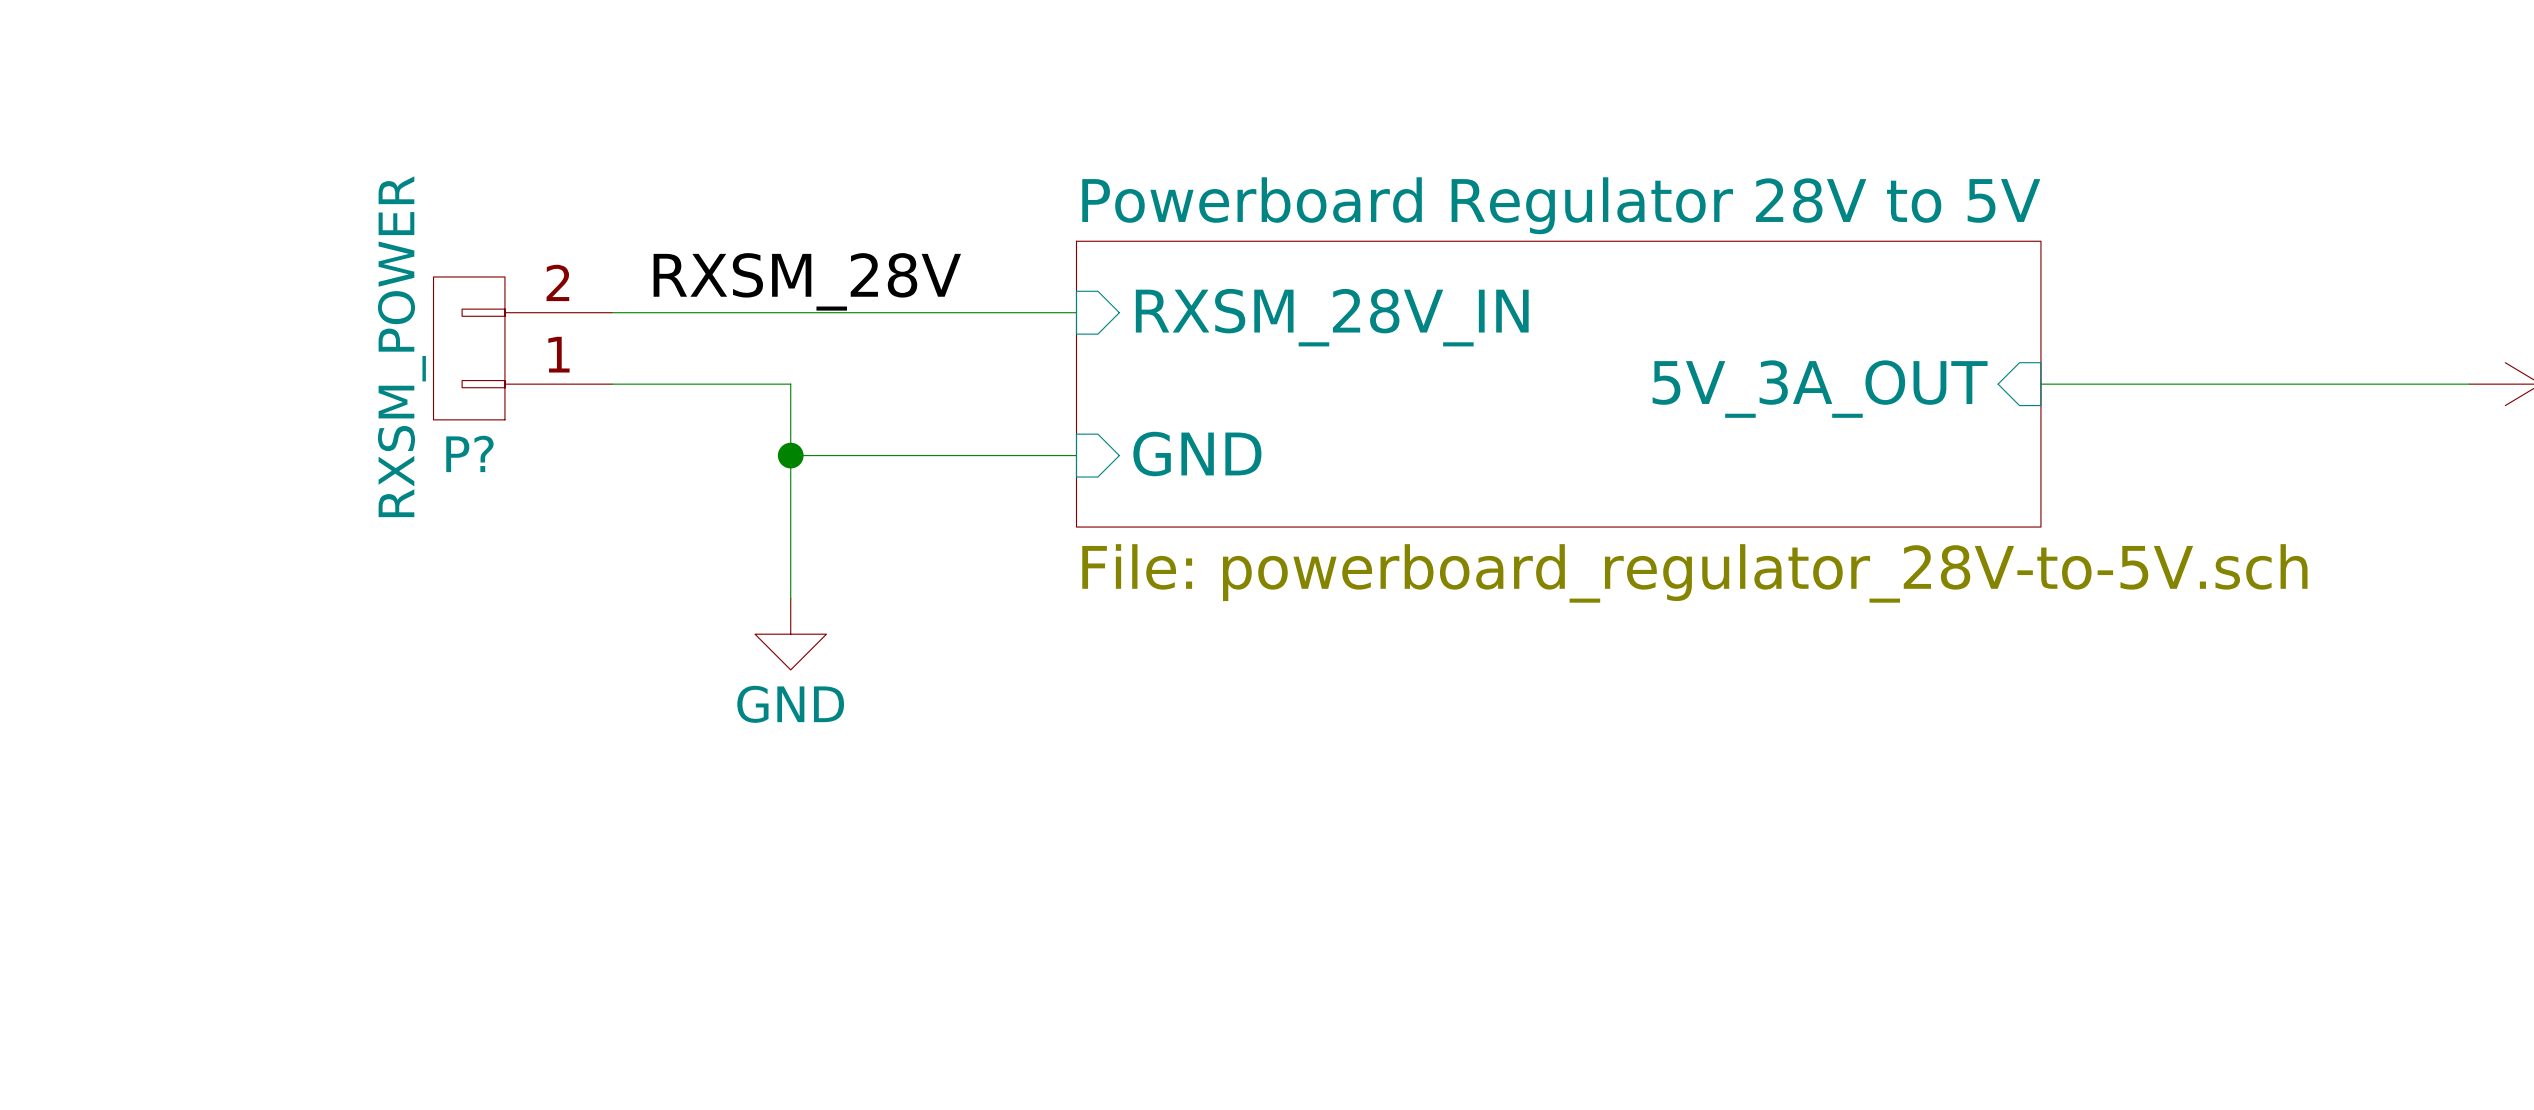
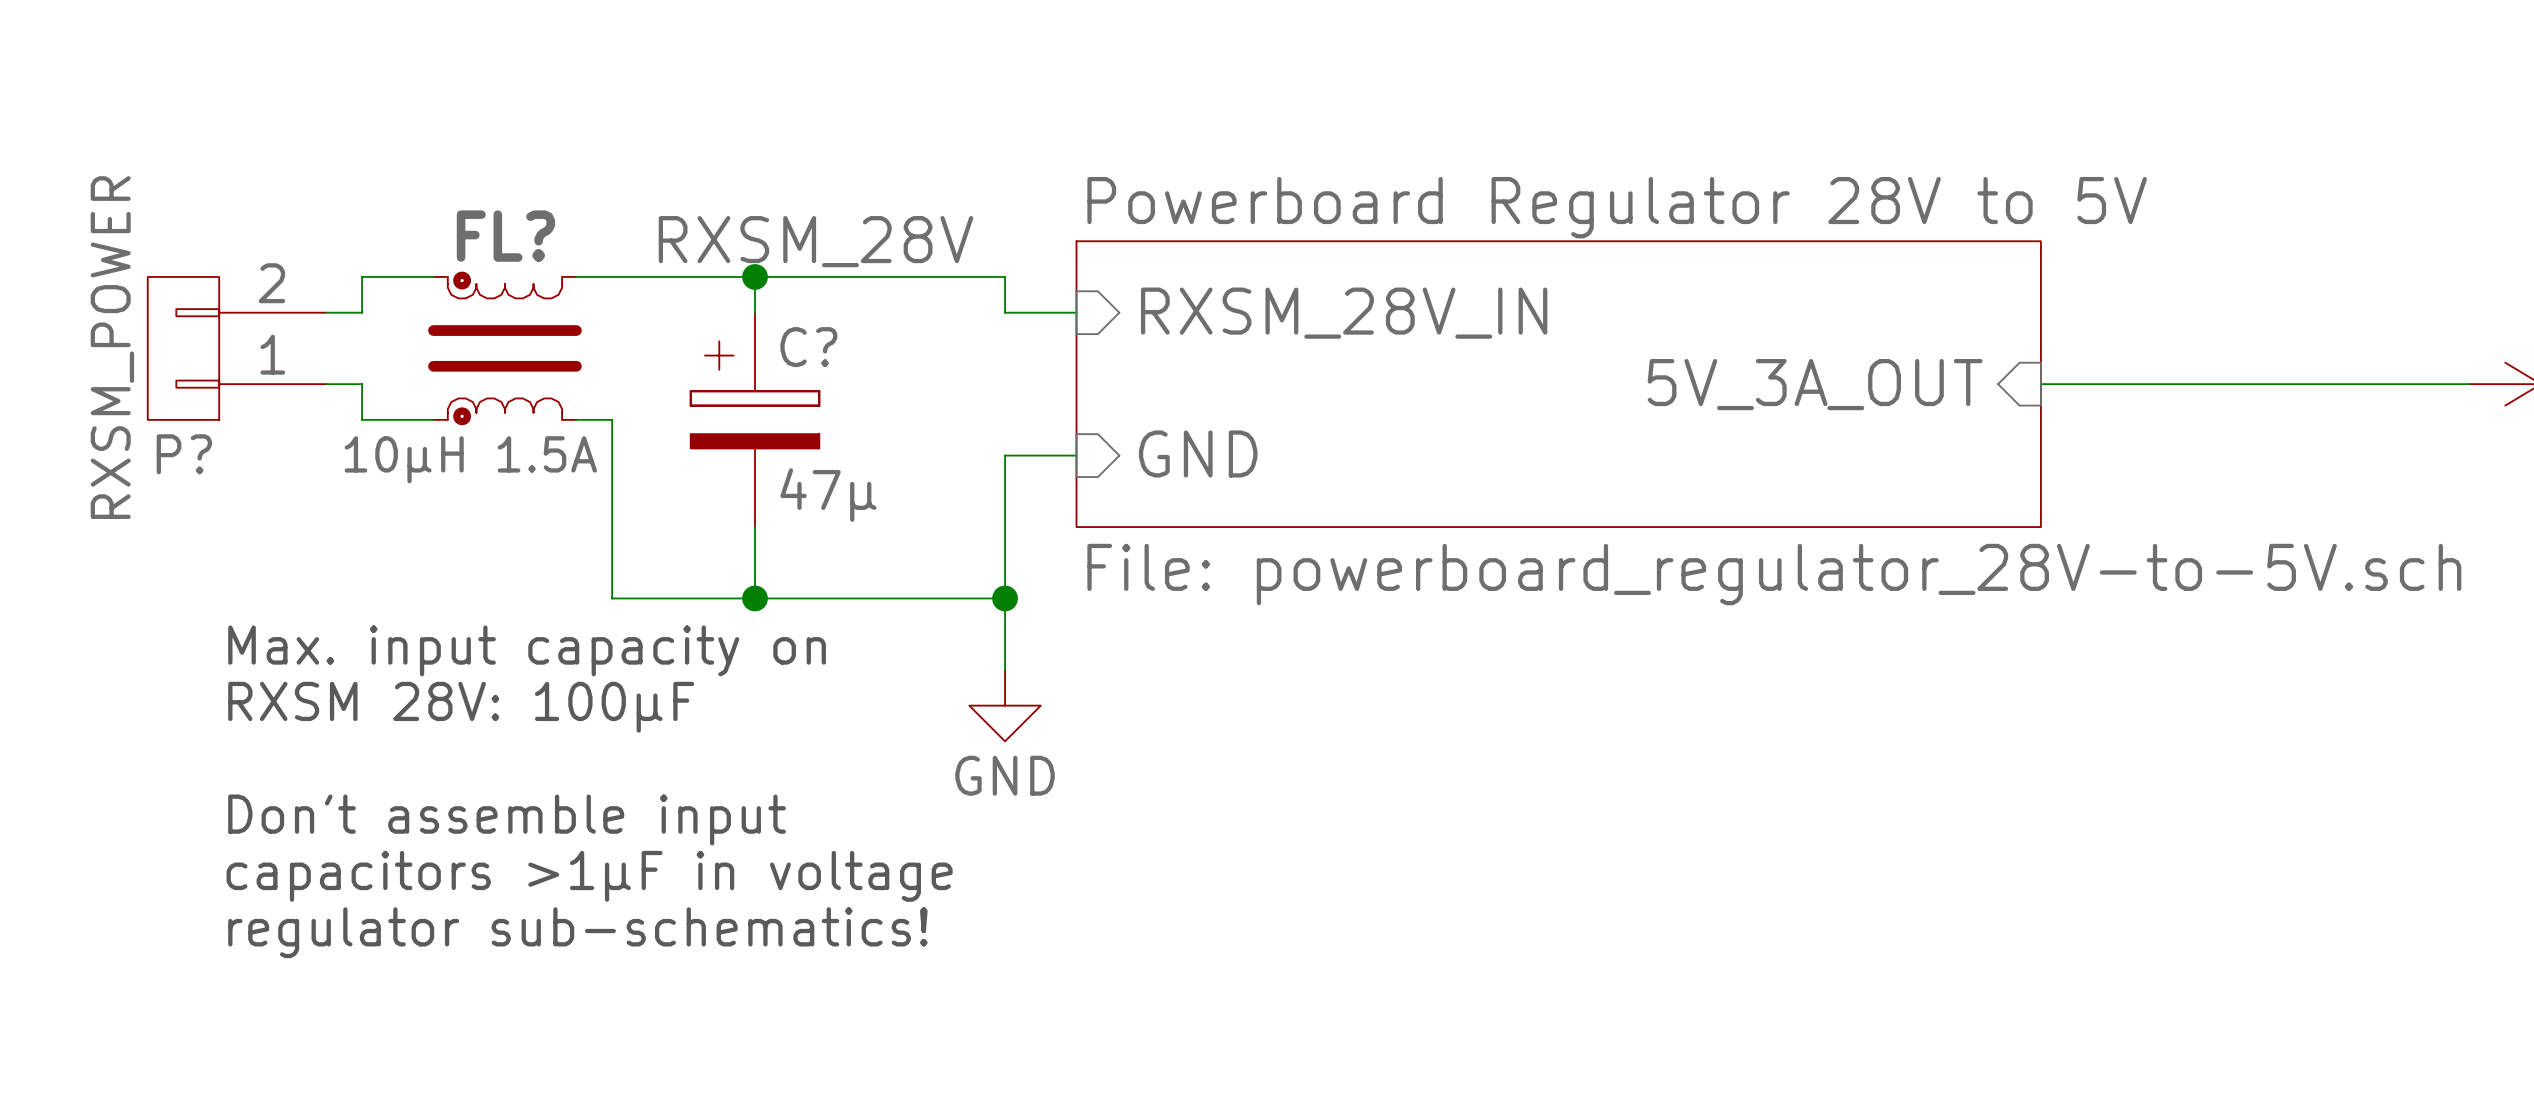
wire: none -> (433, 276) (362, 276) (362, 312) (326, 312)
wire: none -> (755, 276) (755, 312)
junction: none -> (755, 276)
label position: RXSM_28V (807, 281) -> RXSM_28V (816, 241)
wire: (612, 312) (1005, 312) -> (576, 276) (1005, 276) (1005, 312)
FL?: none -> 10µH 1.5A (504, 348)
P? position: (522, 348) -> (237, 348)
wire: none -> (326, 384) (362, 384) (362, 419) (433, 419)
wire: (612, 384) (790, 384) (790, 598) -> none
wire: none -> (576, 419) (612, 419) (612, 598) (1005, 598)
C?: none -> 47µ (755, 419)
wire: (790, 455) (1005, 455) -> (1005, 669) (1005, 455)
junction: (790, 455) -> none
wire: none -> (755, 527) (755, 598)
junction: none -> (755, 598)
junction: none -> (1005, 598)
power symbol position: GND (790, 634) -> GND (1005, 705)
text: none -> Max. input capacity on (527, 650)
text: none -> RXSM 28V: 100µF (461, 707)
text: none -> Don't assemble input (507, 819)
text: none -> capacitors >1µF in voltage (589, 876)
text: none -> regulator sub-schematics! (577, 932)

